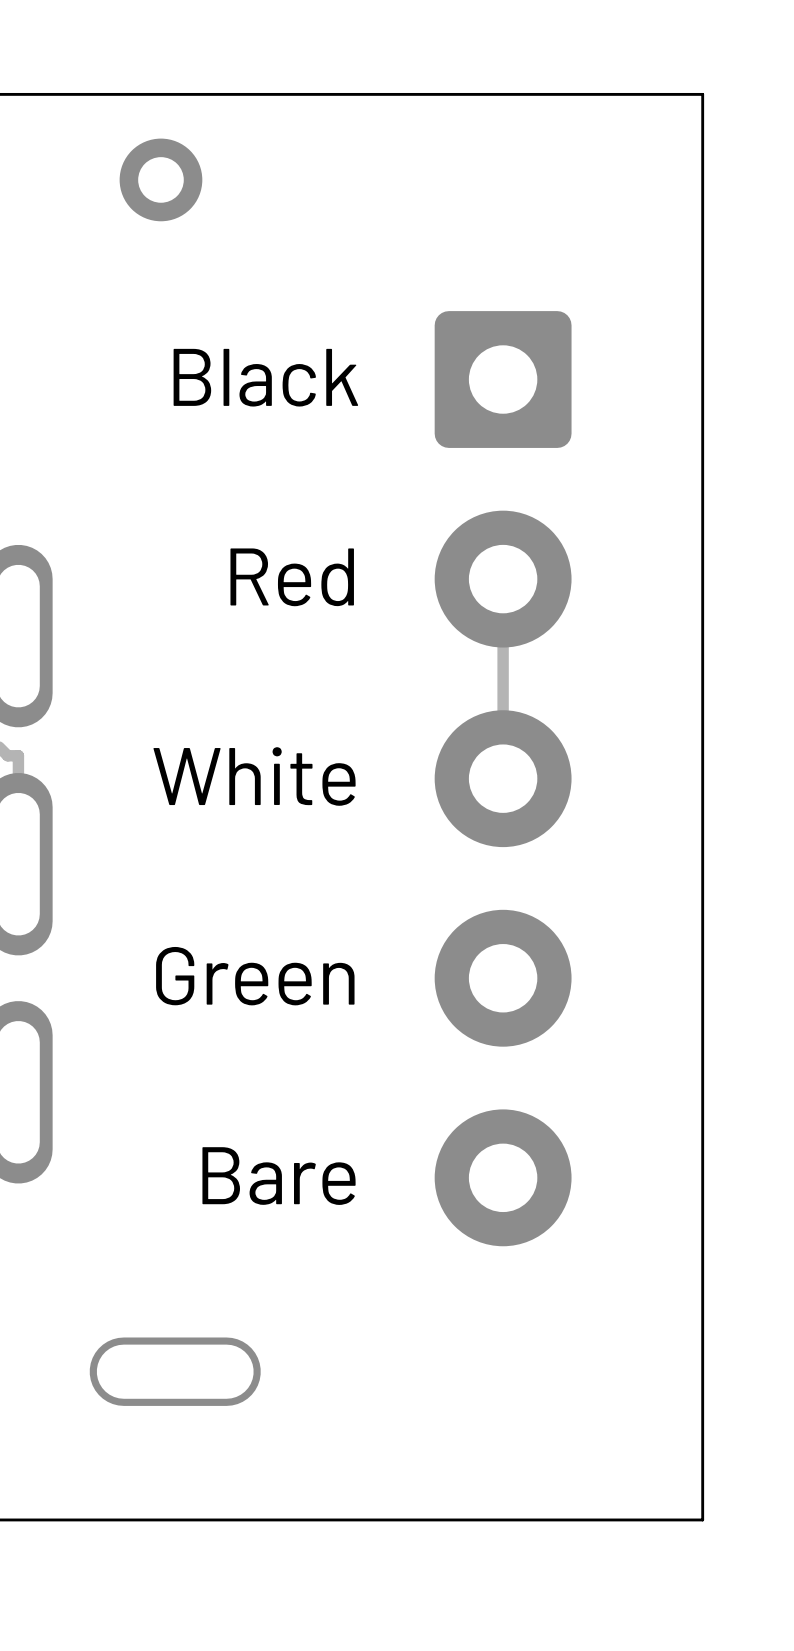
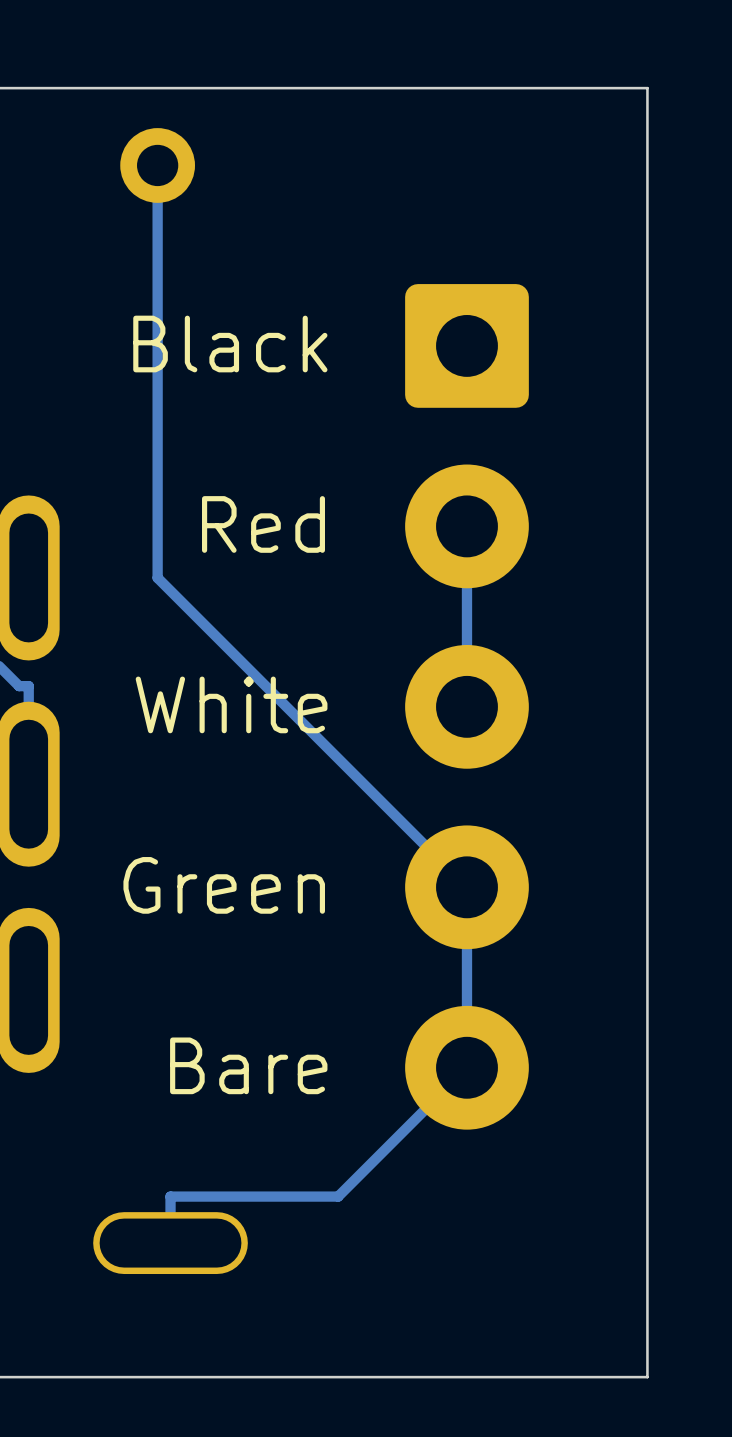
track: none -> (157, 165) (157, 577) (466, 887) (466, 1067) (338, 1196) (170, 1196) (170, 1243)

